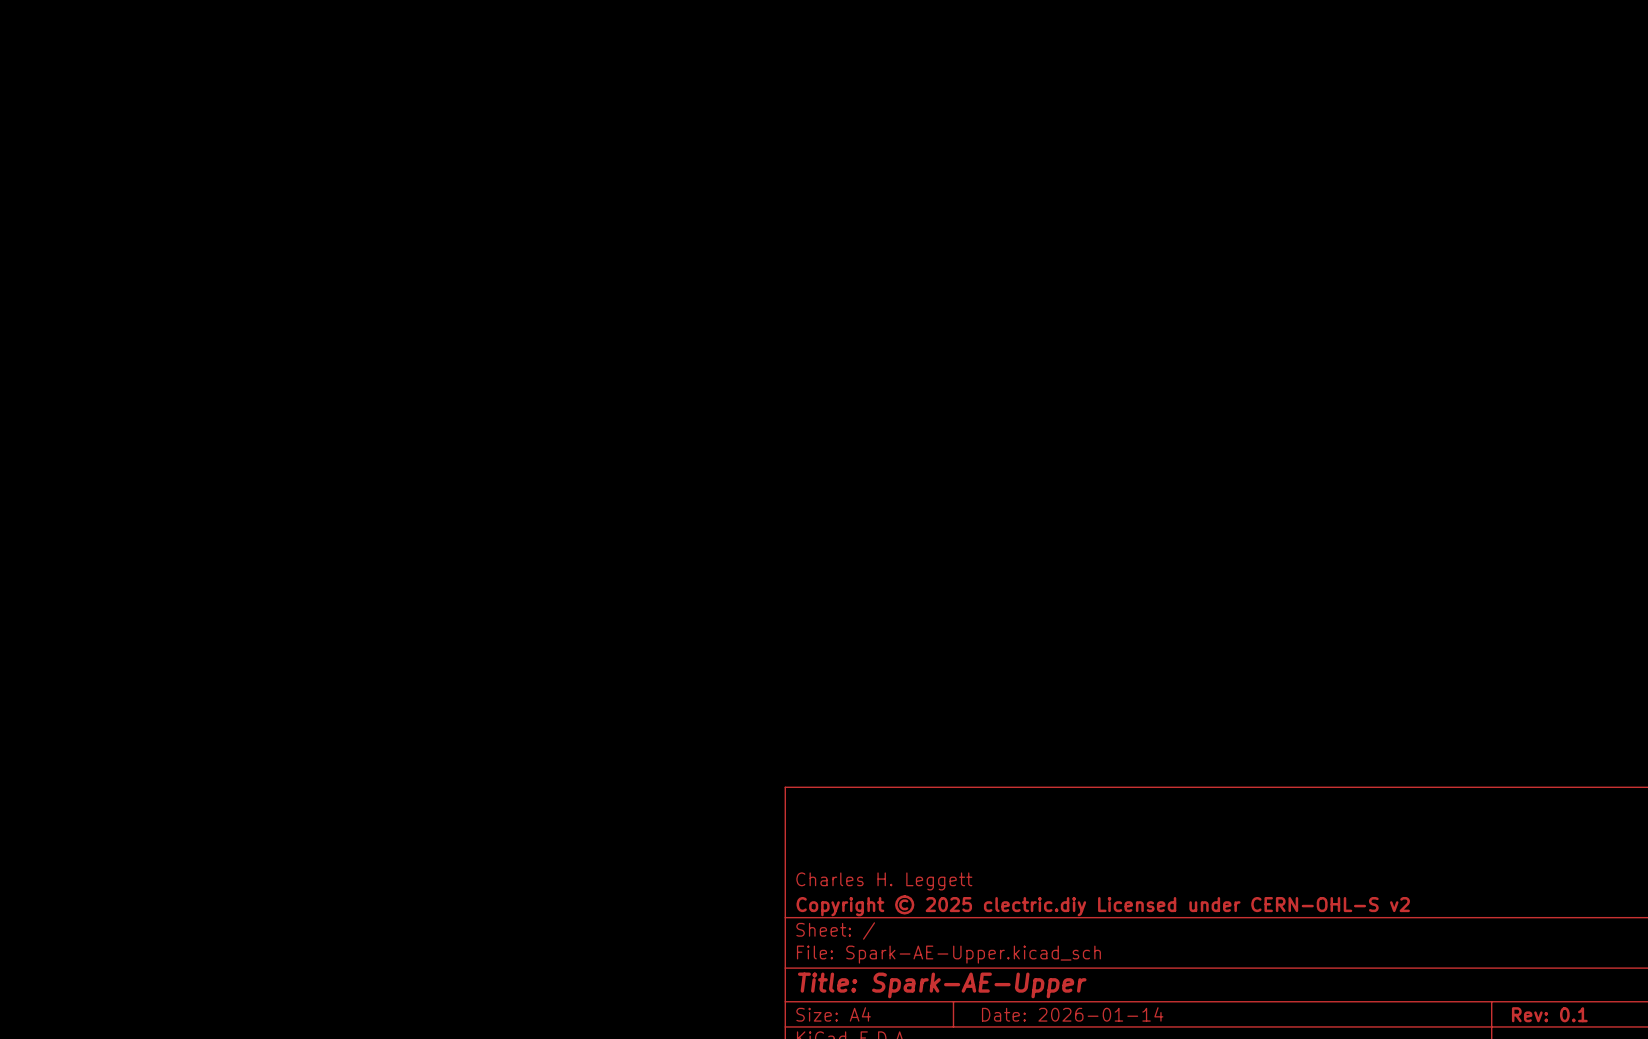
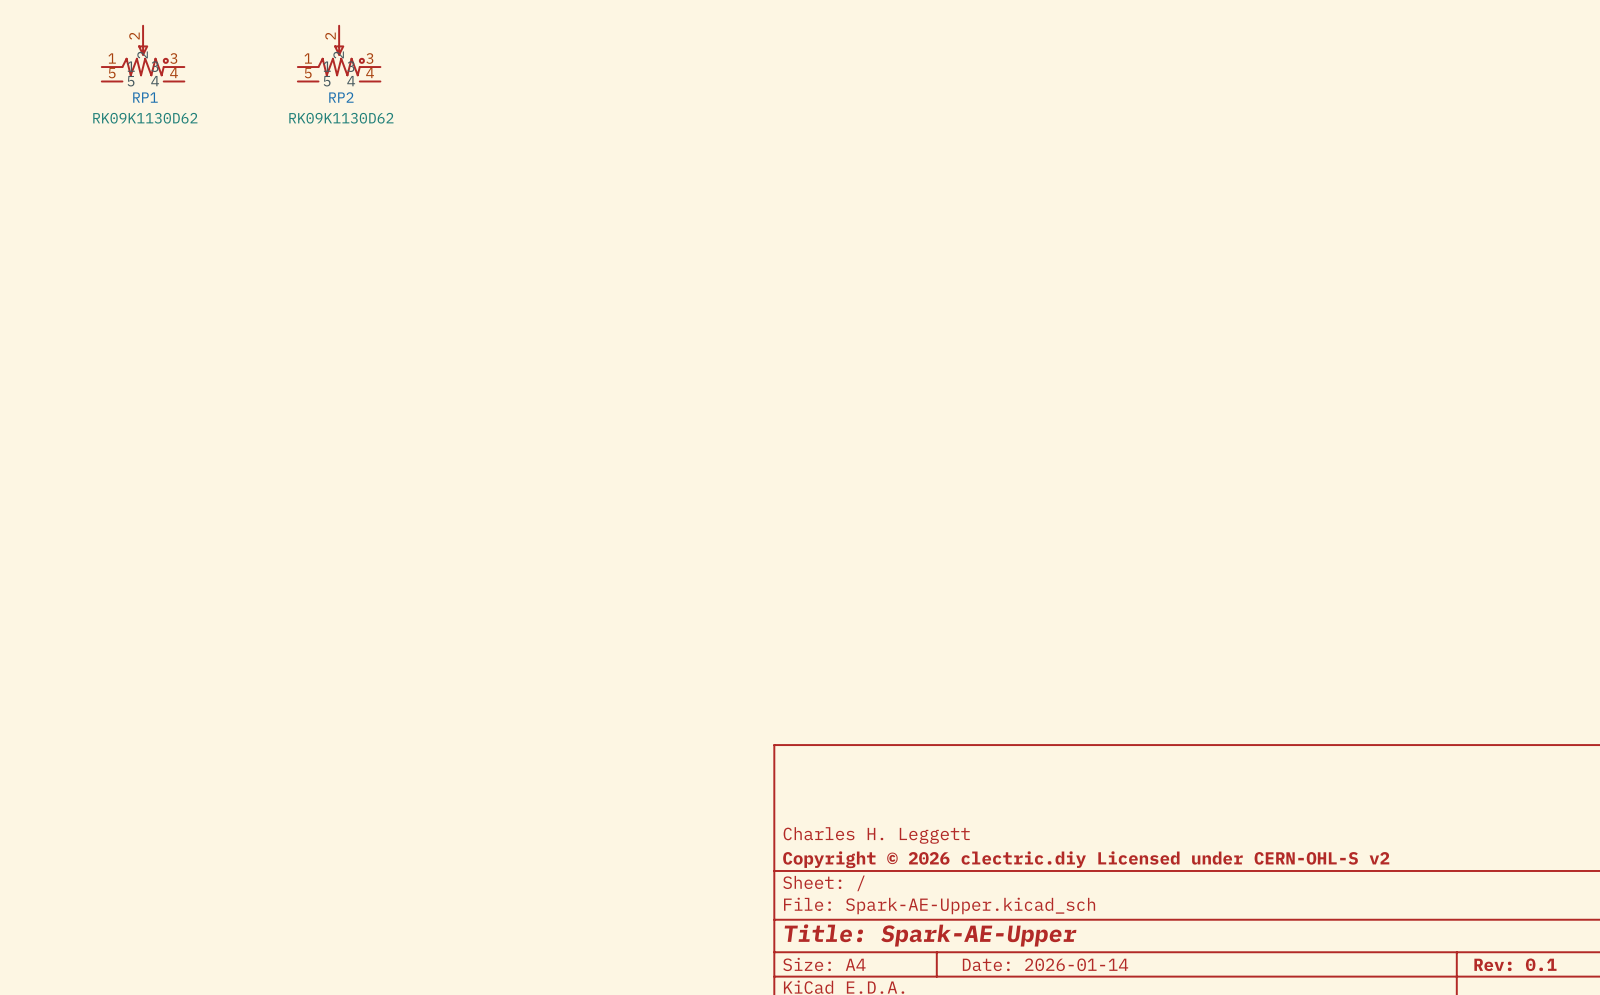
RP1: none -> RK09K1130D62 (143, 53)
RP2: none -> RK09K1130D62 (339, 53)
title block: Copyright © 2025 clectric.diy Licensed under CERN-OHL-S v2 (1103, 905) -> Copyright © 2026 clectric.diy Licensed under CERN-OHL-S v2 (1086, 859)

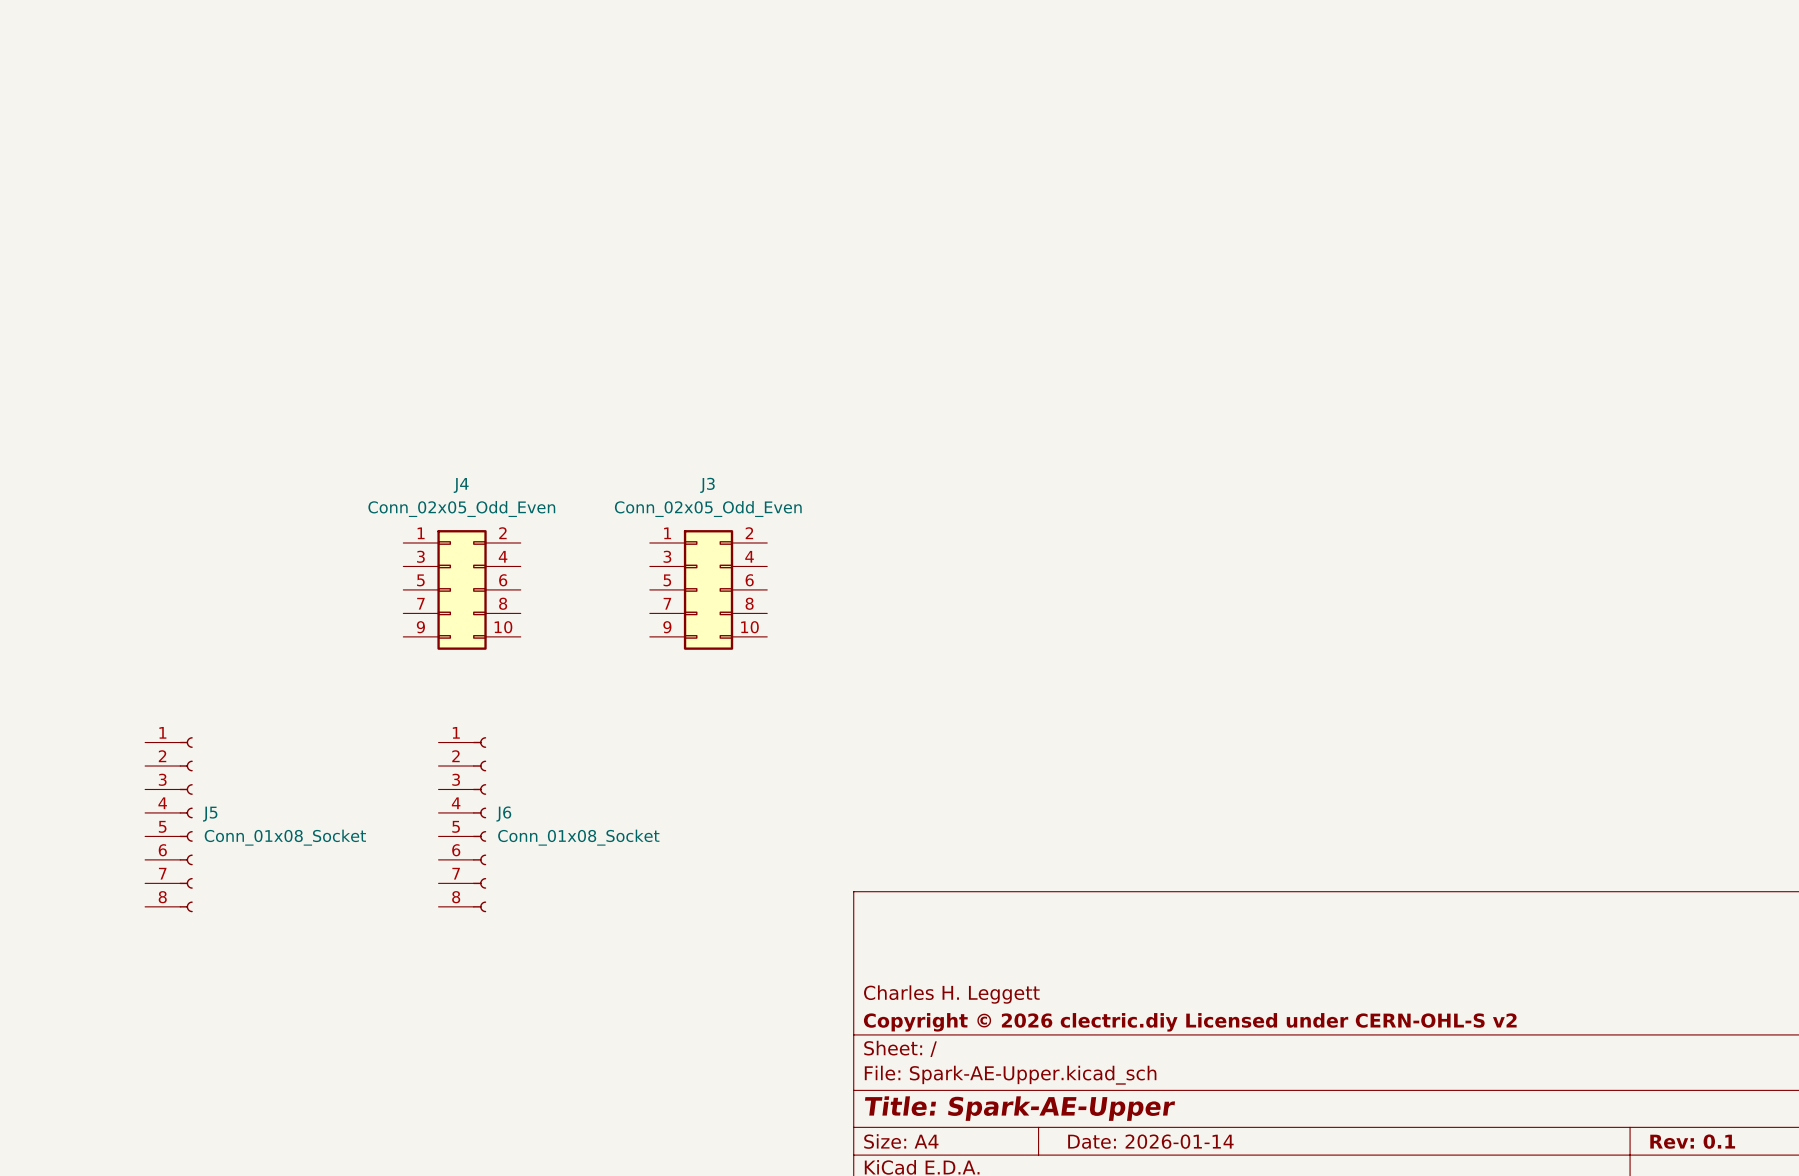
RP1: RK09K1130D62 (143, 53) -> none
RP2: RK09K1130D62 (339, 53) -> none
J4: none -> Conn_02x05_Odd_Even (462, 589)
J3: none -> Conn_02x05_Odd_Even (708, 589)
J5: none -> Conn_01x08_Socket (168, 824)
J6: none -> Conn_01x08_Socket (462, 824)

